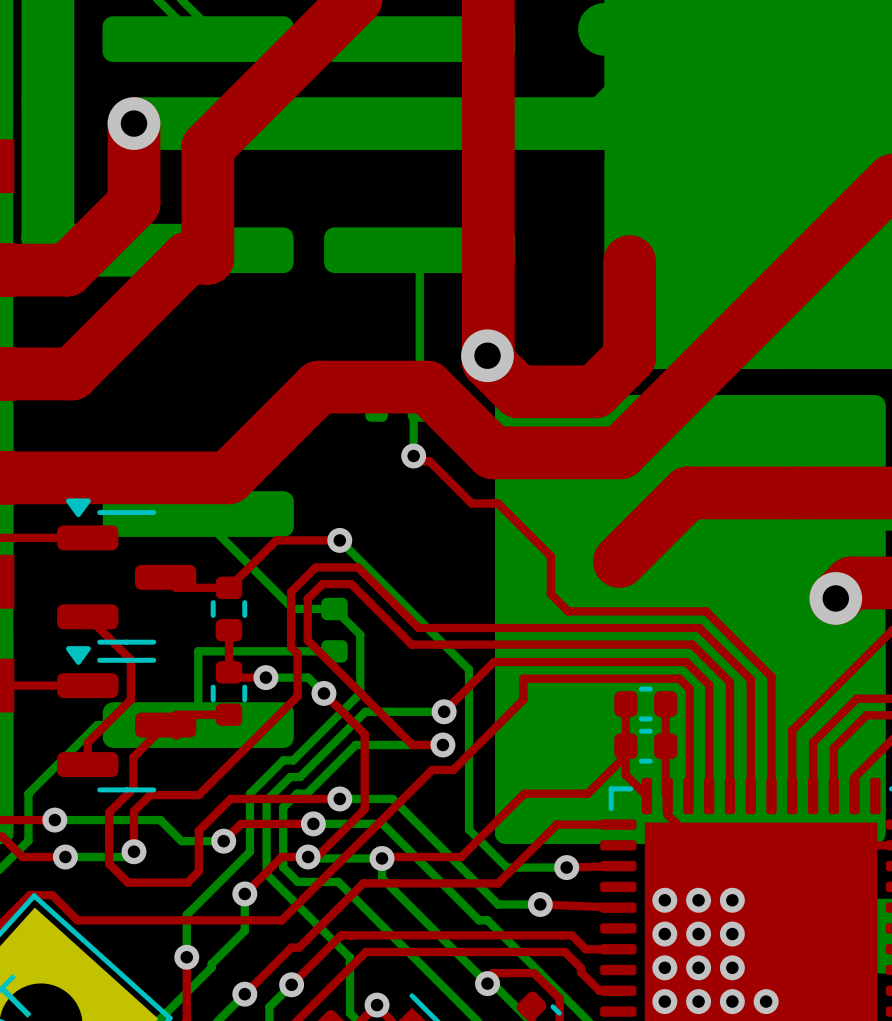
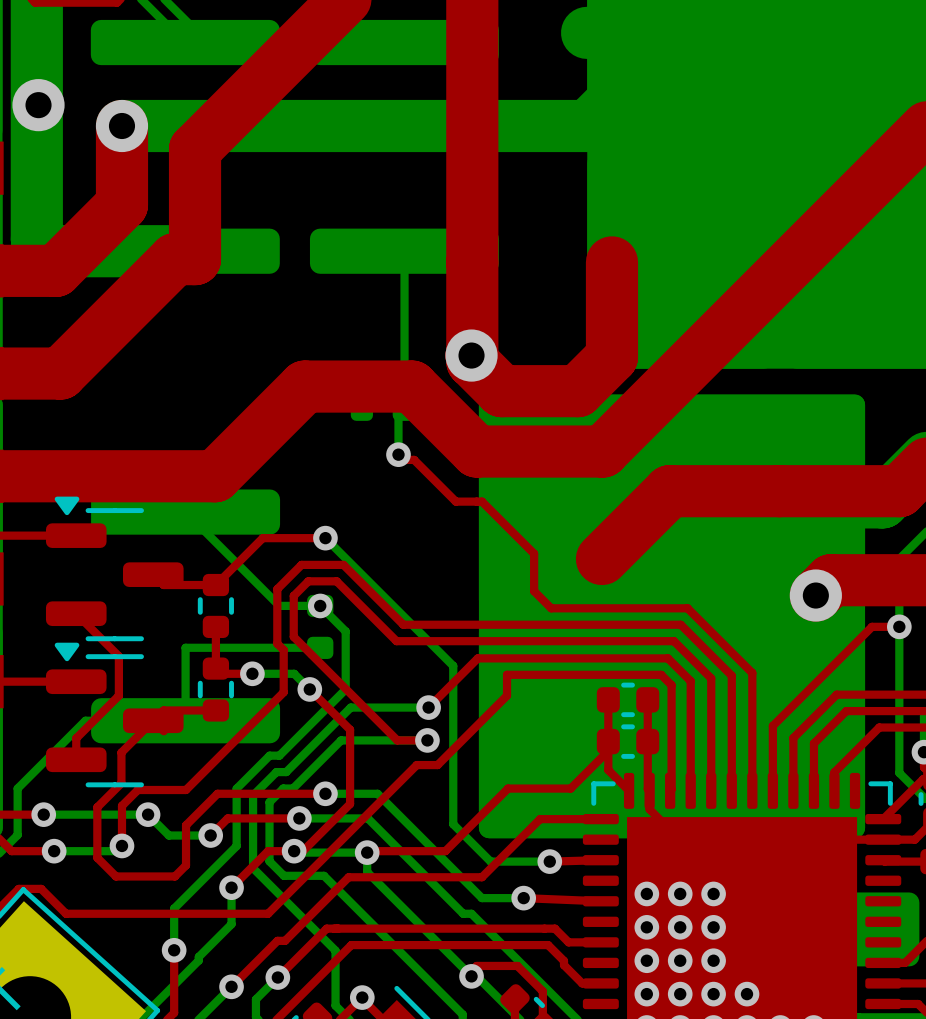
via: none -> (38, 105)
via: none -> (320, 605)
via: none -> (148, 814)

